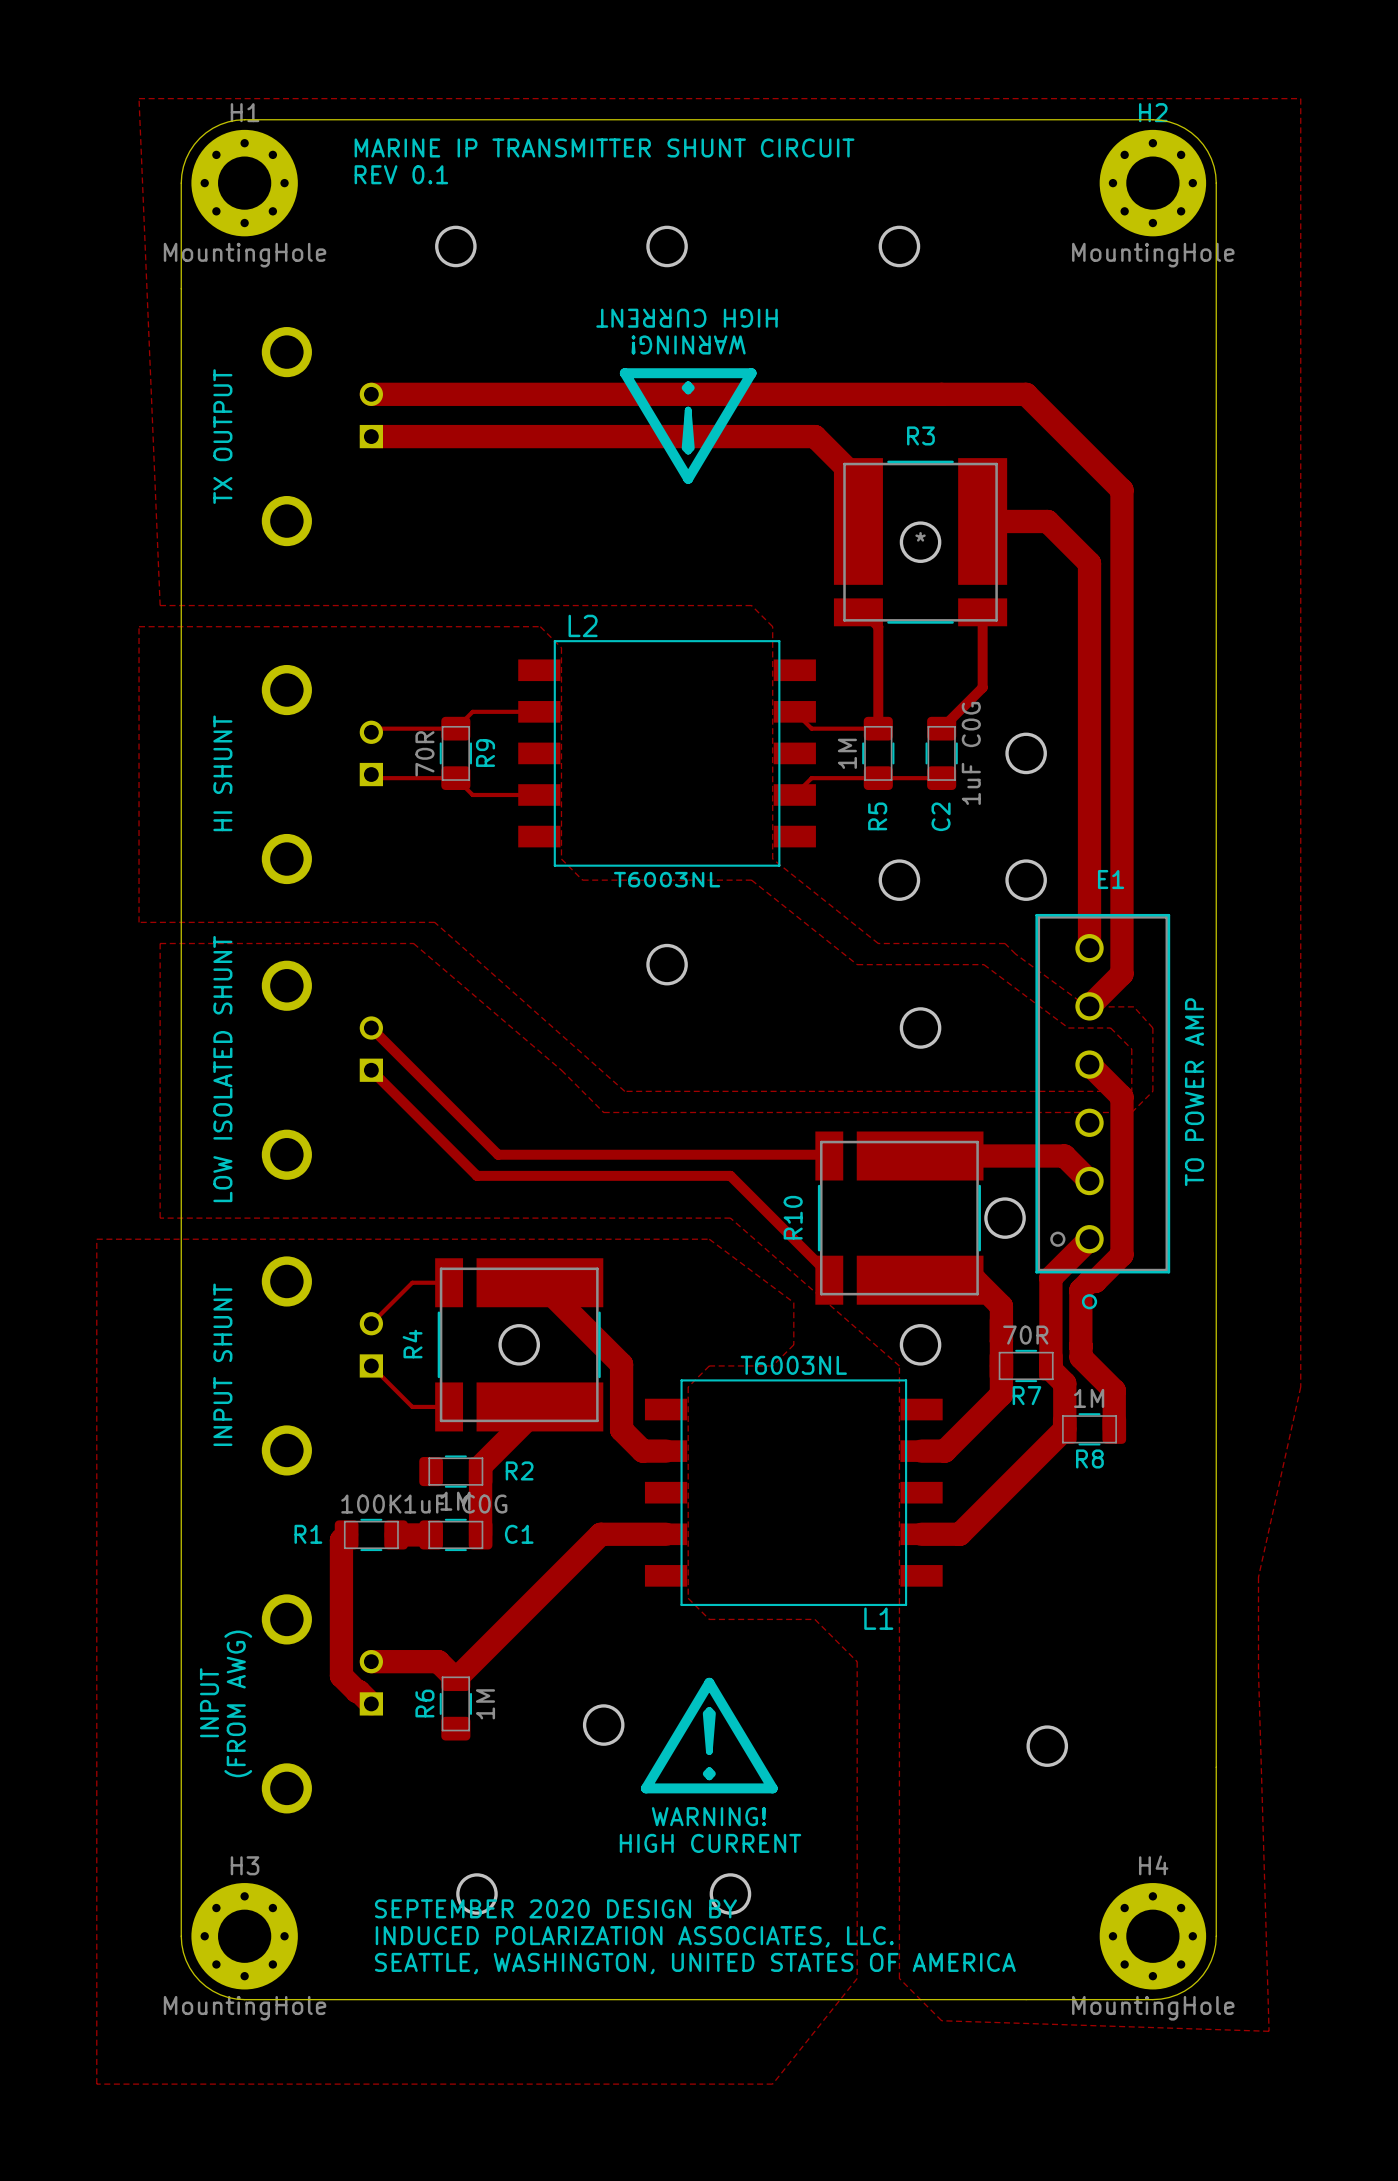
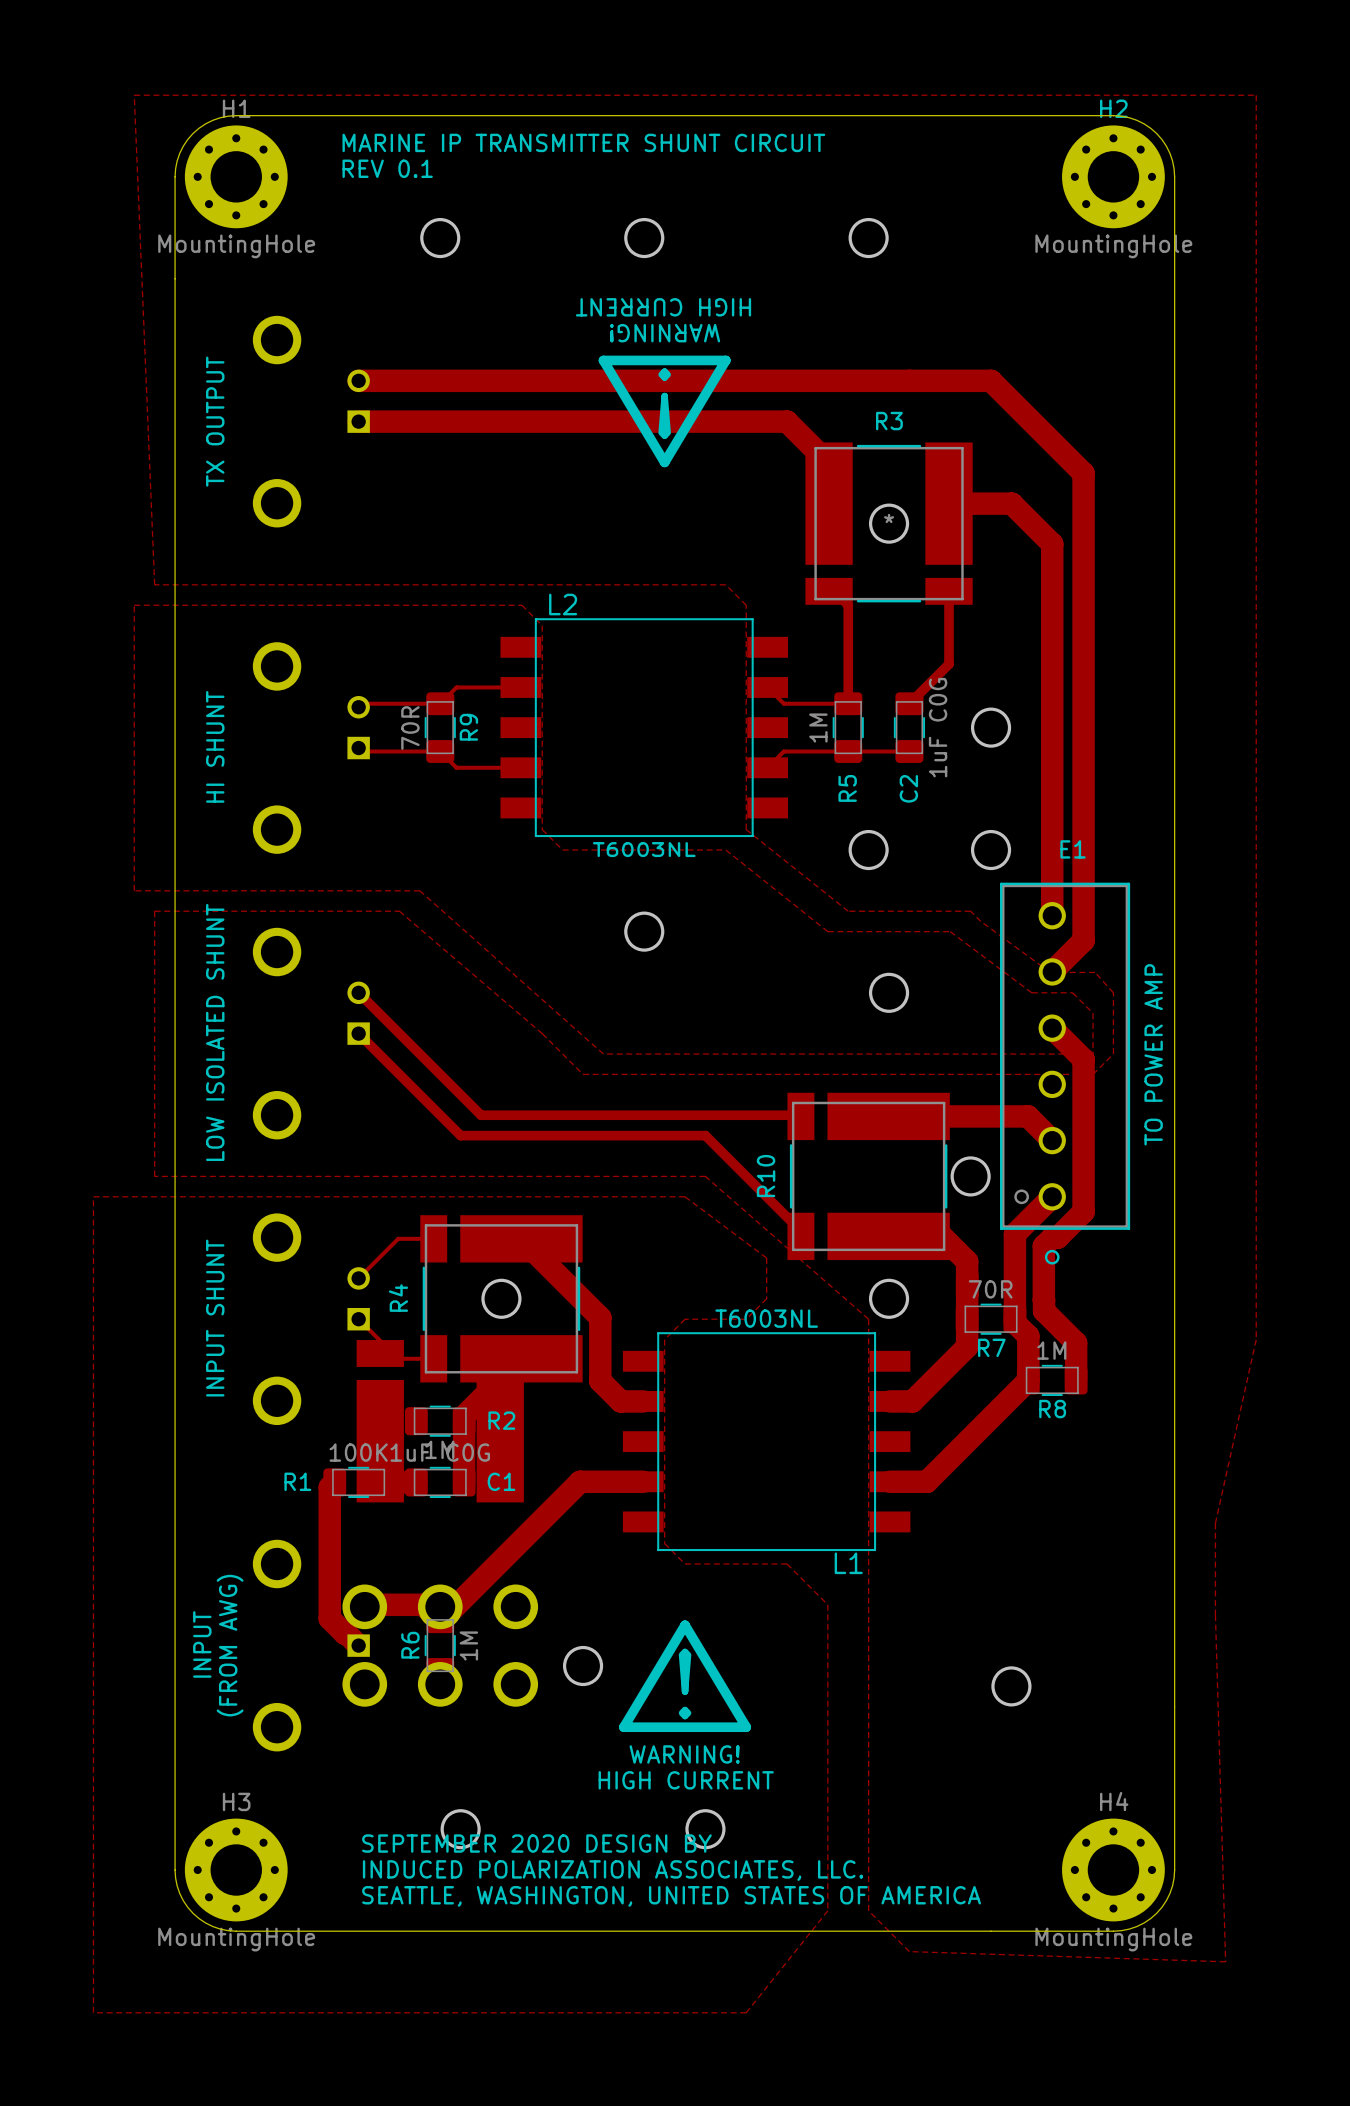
R2 footprint: [419, 1455, 493, 1488] -> [356, 1340, 524, 1503]
R6 footprint: [439, 1667, 472, 1741] -> [342, 1584, 539, 1707]

